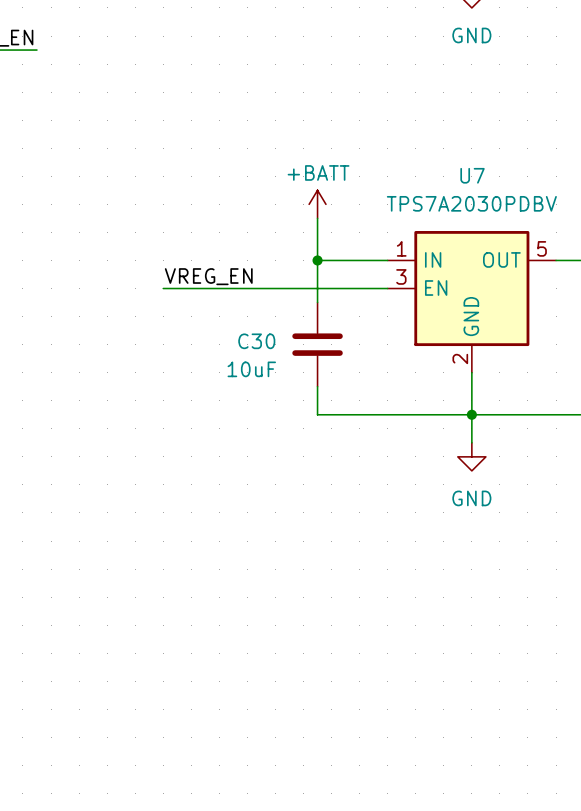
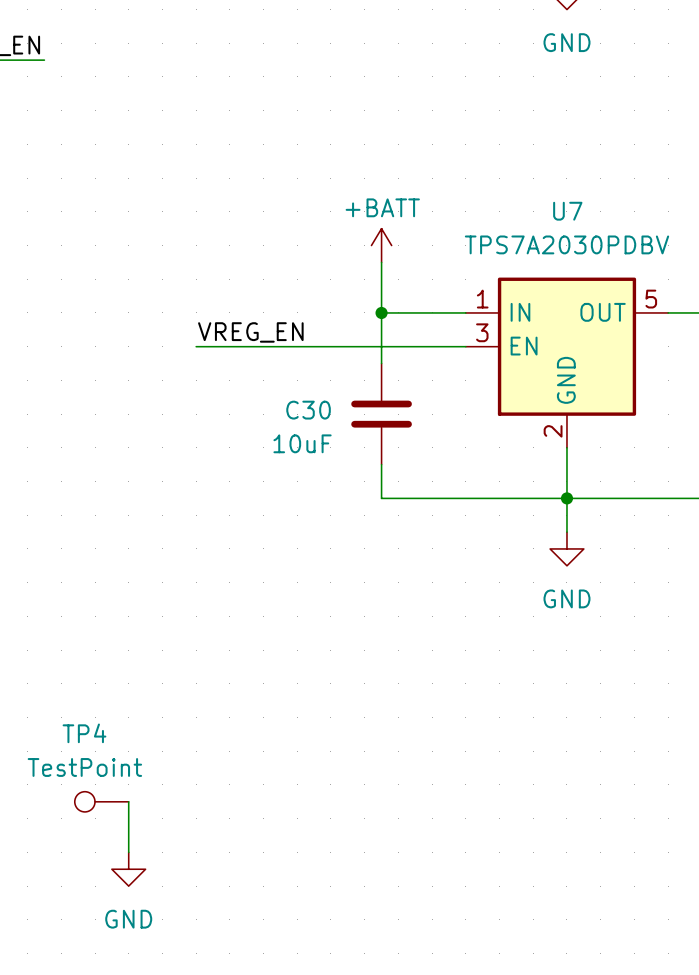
TP4: none -> TestPoint (101, 801)
wire: none -> (128, 801) (128, 852)
power symbol: none -> GND (128, 869)

